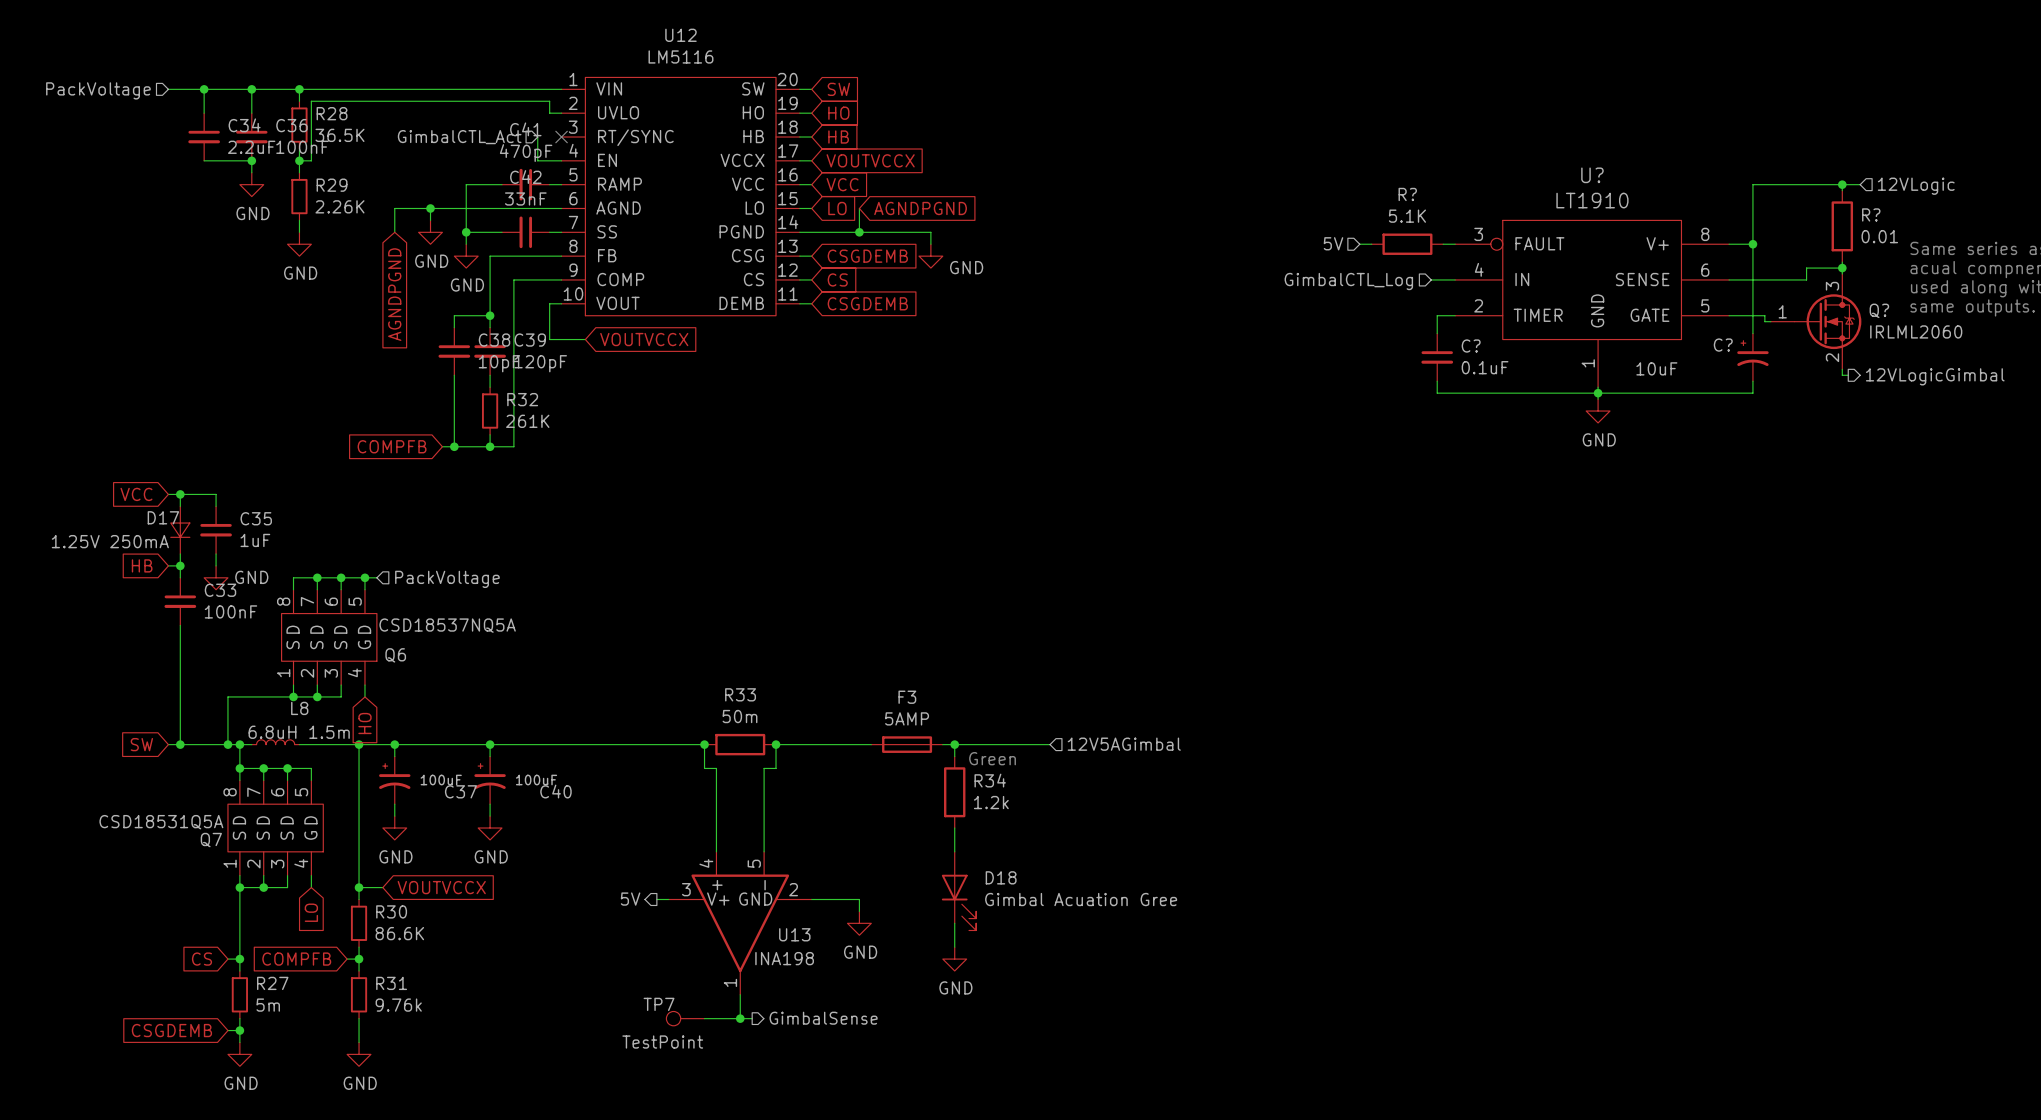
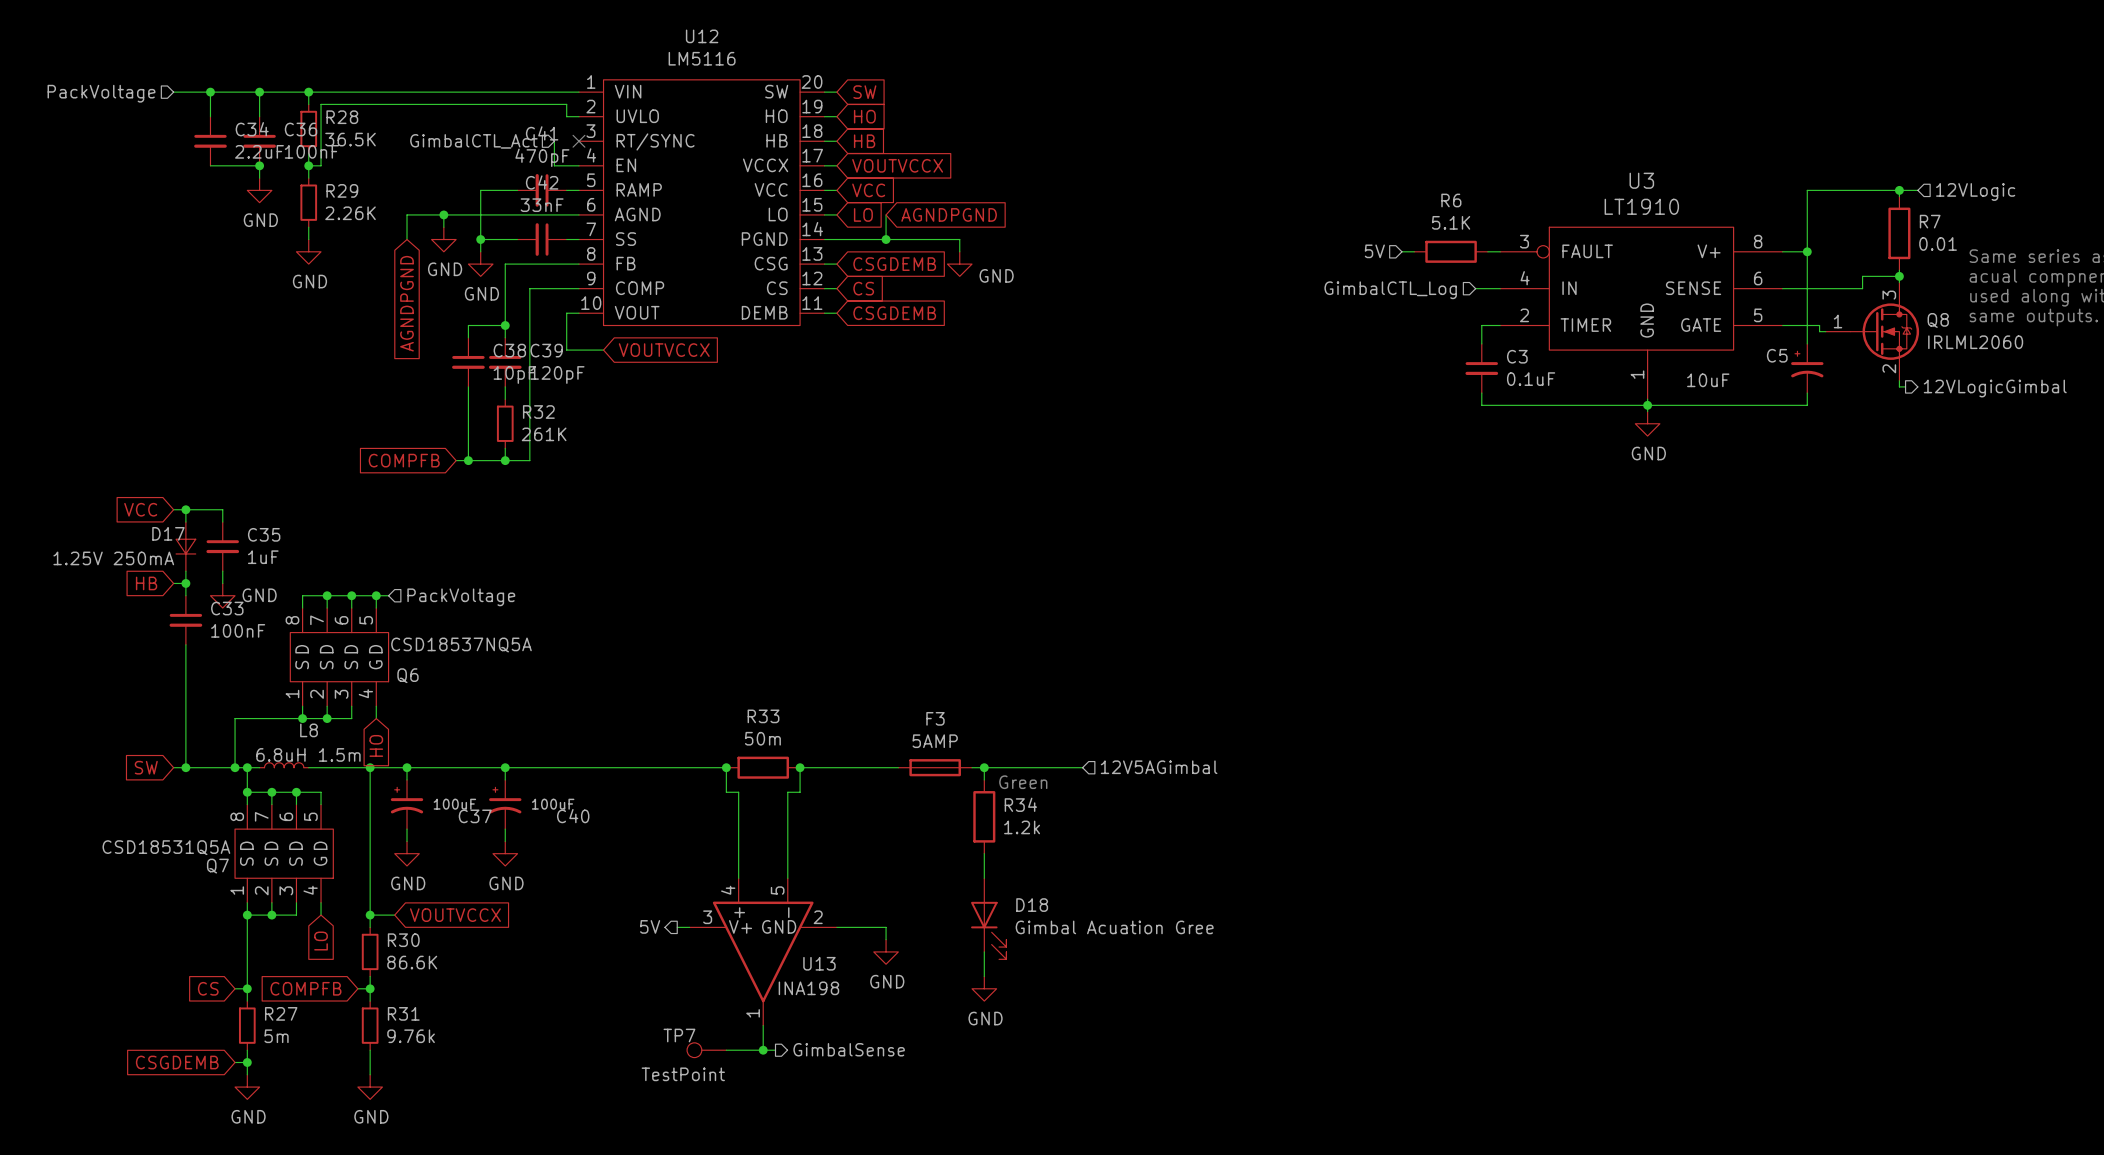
U? name: U? (1592, 175) -> U3 (1641, 180)
R? name: R? (1407, 194) -> R6 (1451, 200)
R? name: R? (1871, 214) -> R7 (1930, 221)
Q? name: Q? (1879, 310) -> Q8 (1938, 320)
C? name: C? (1723, 345) -> C5 (1777, 355)
C? name: C? (1471, 346) -> C3 (1517, 356)

